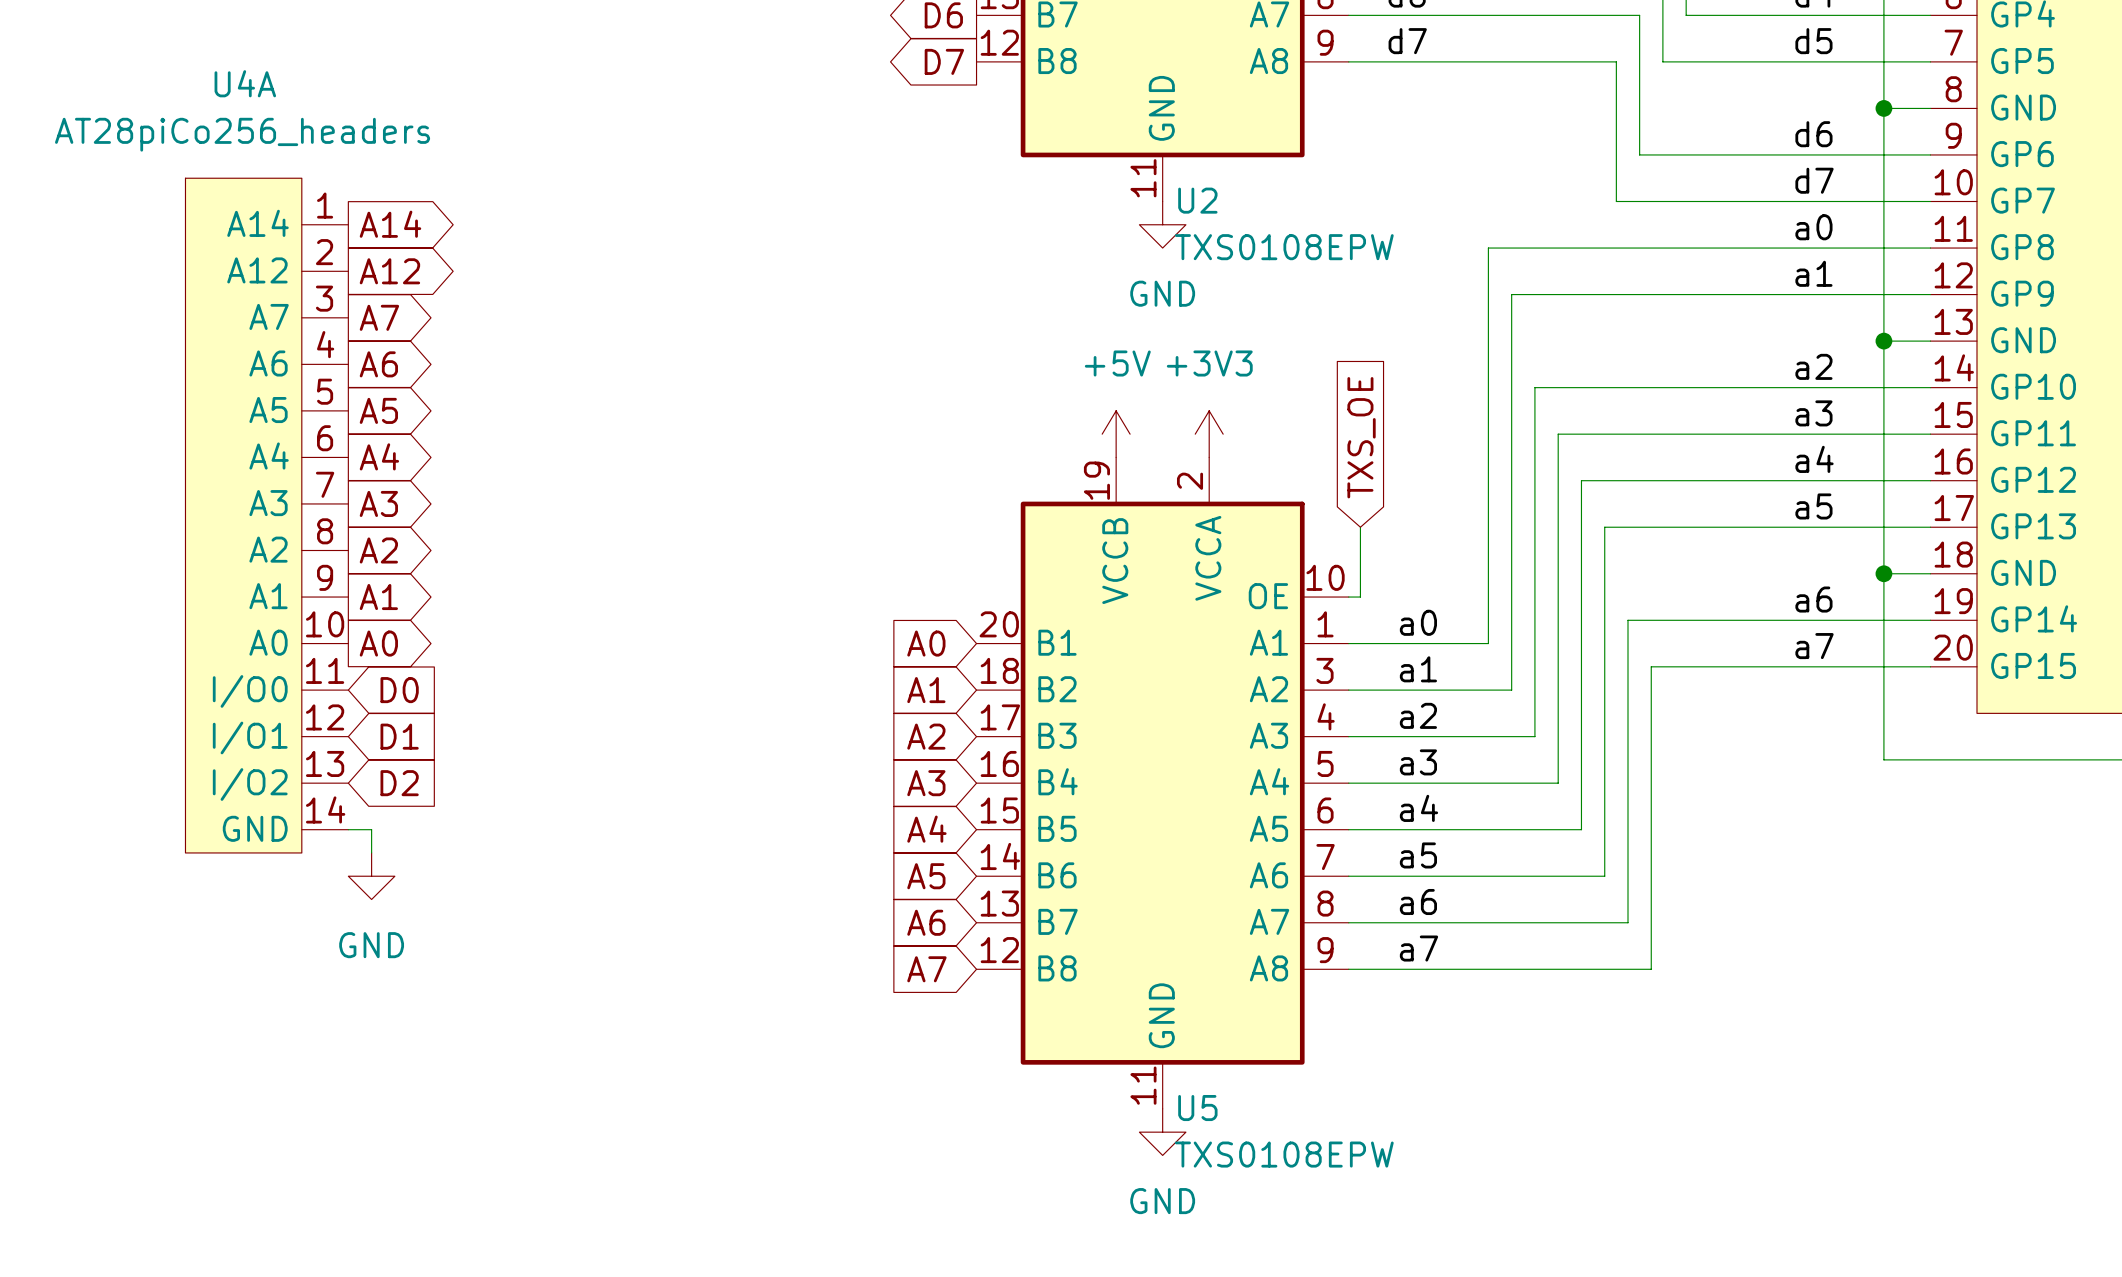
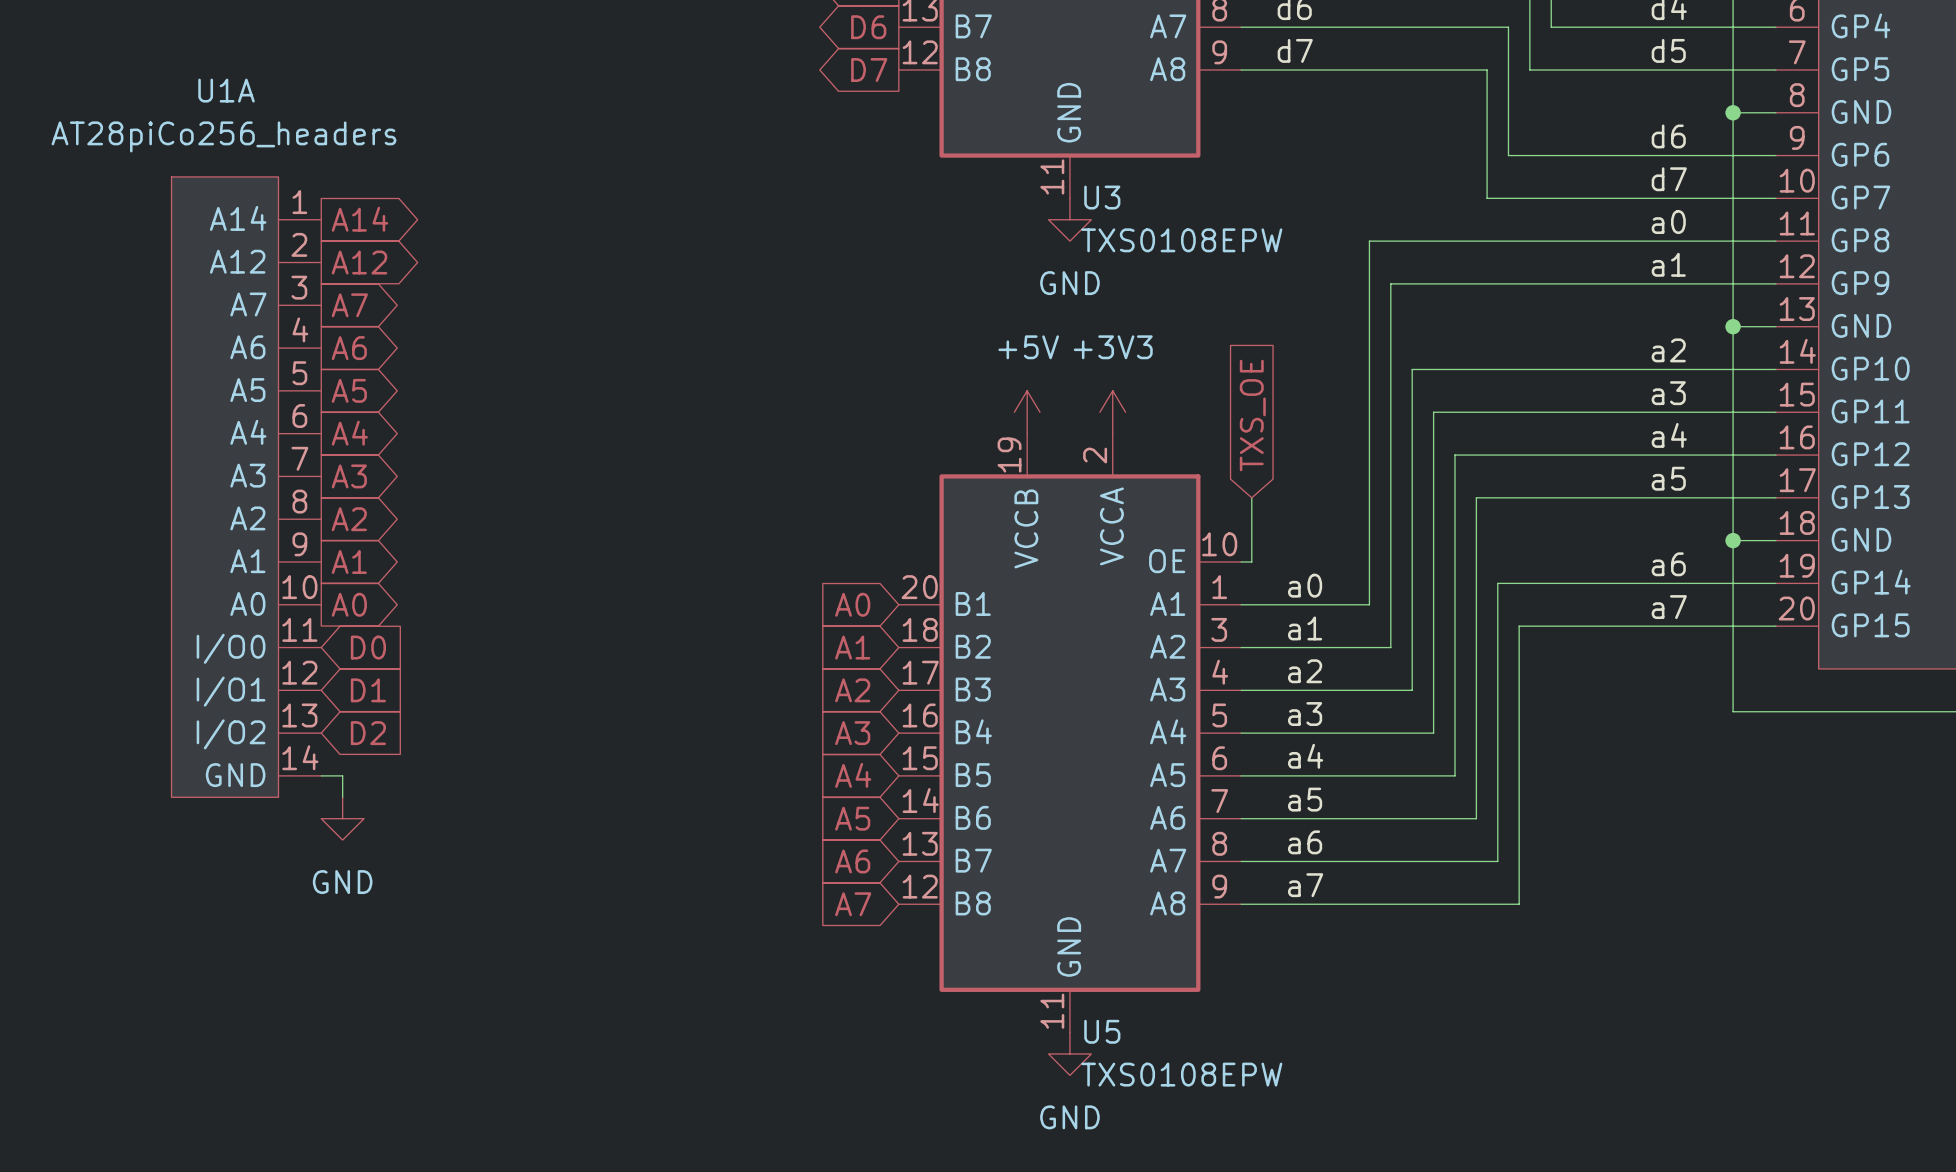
U4A name: U4A (245, 83) -> U1A (226, 90)
U2 name: U2 (1197, 200) -> U3 (1102, 197)

